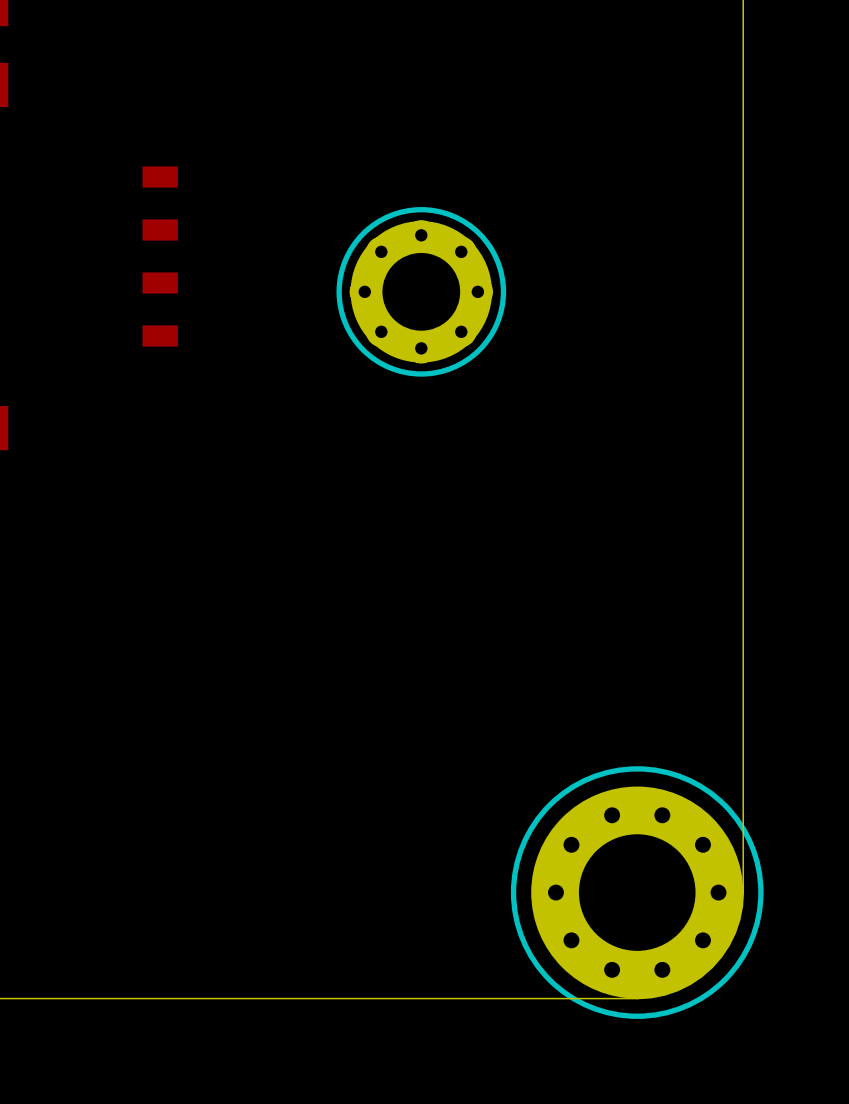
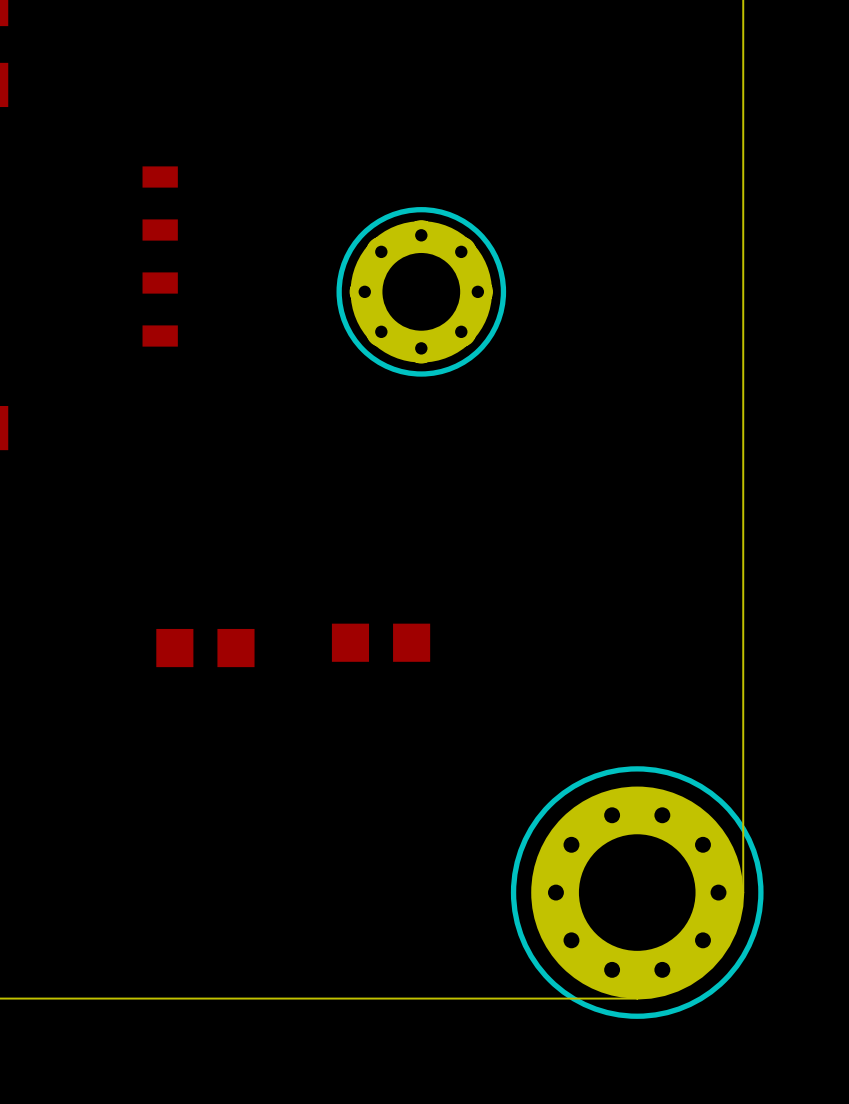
part: none -> (381, 642)
part: none -> (205, 648)

